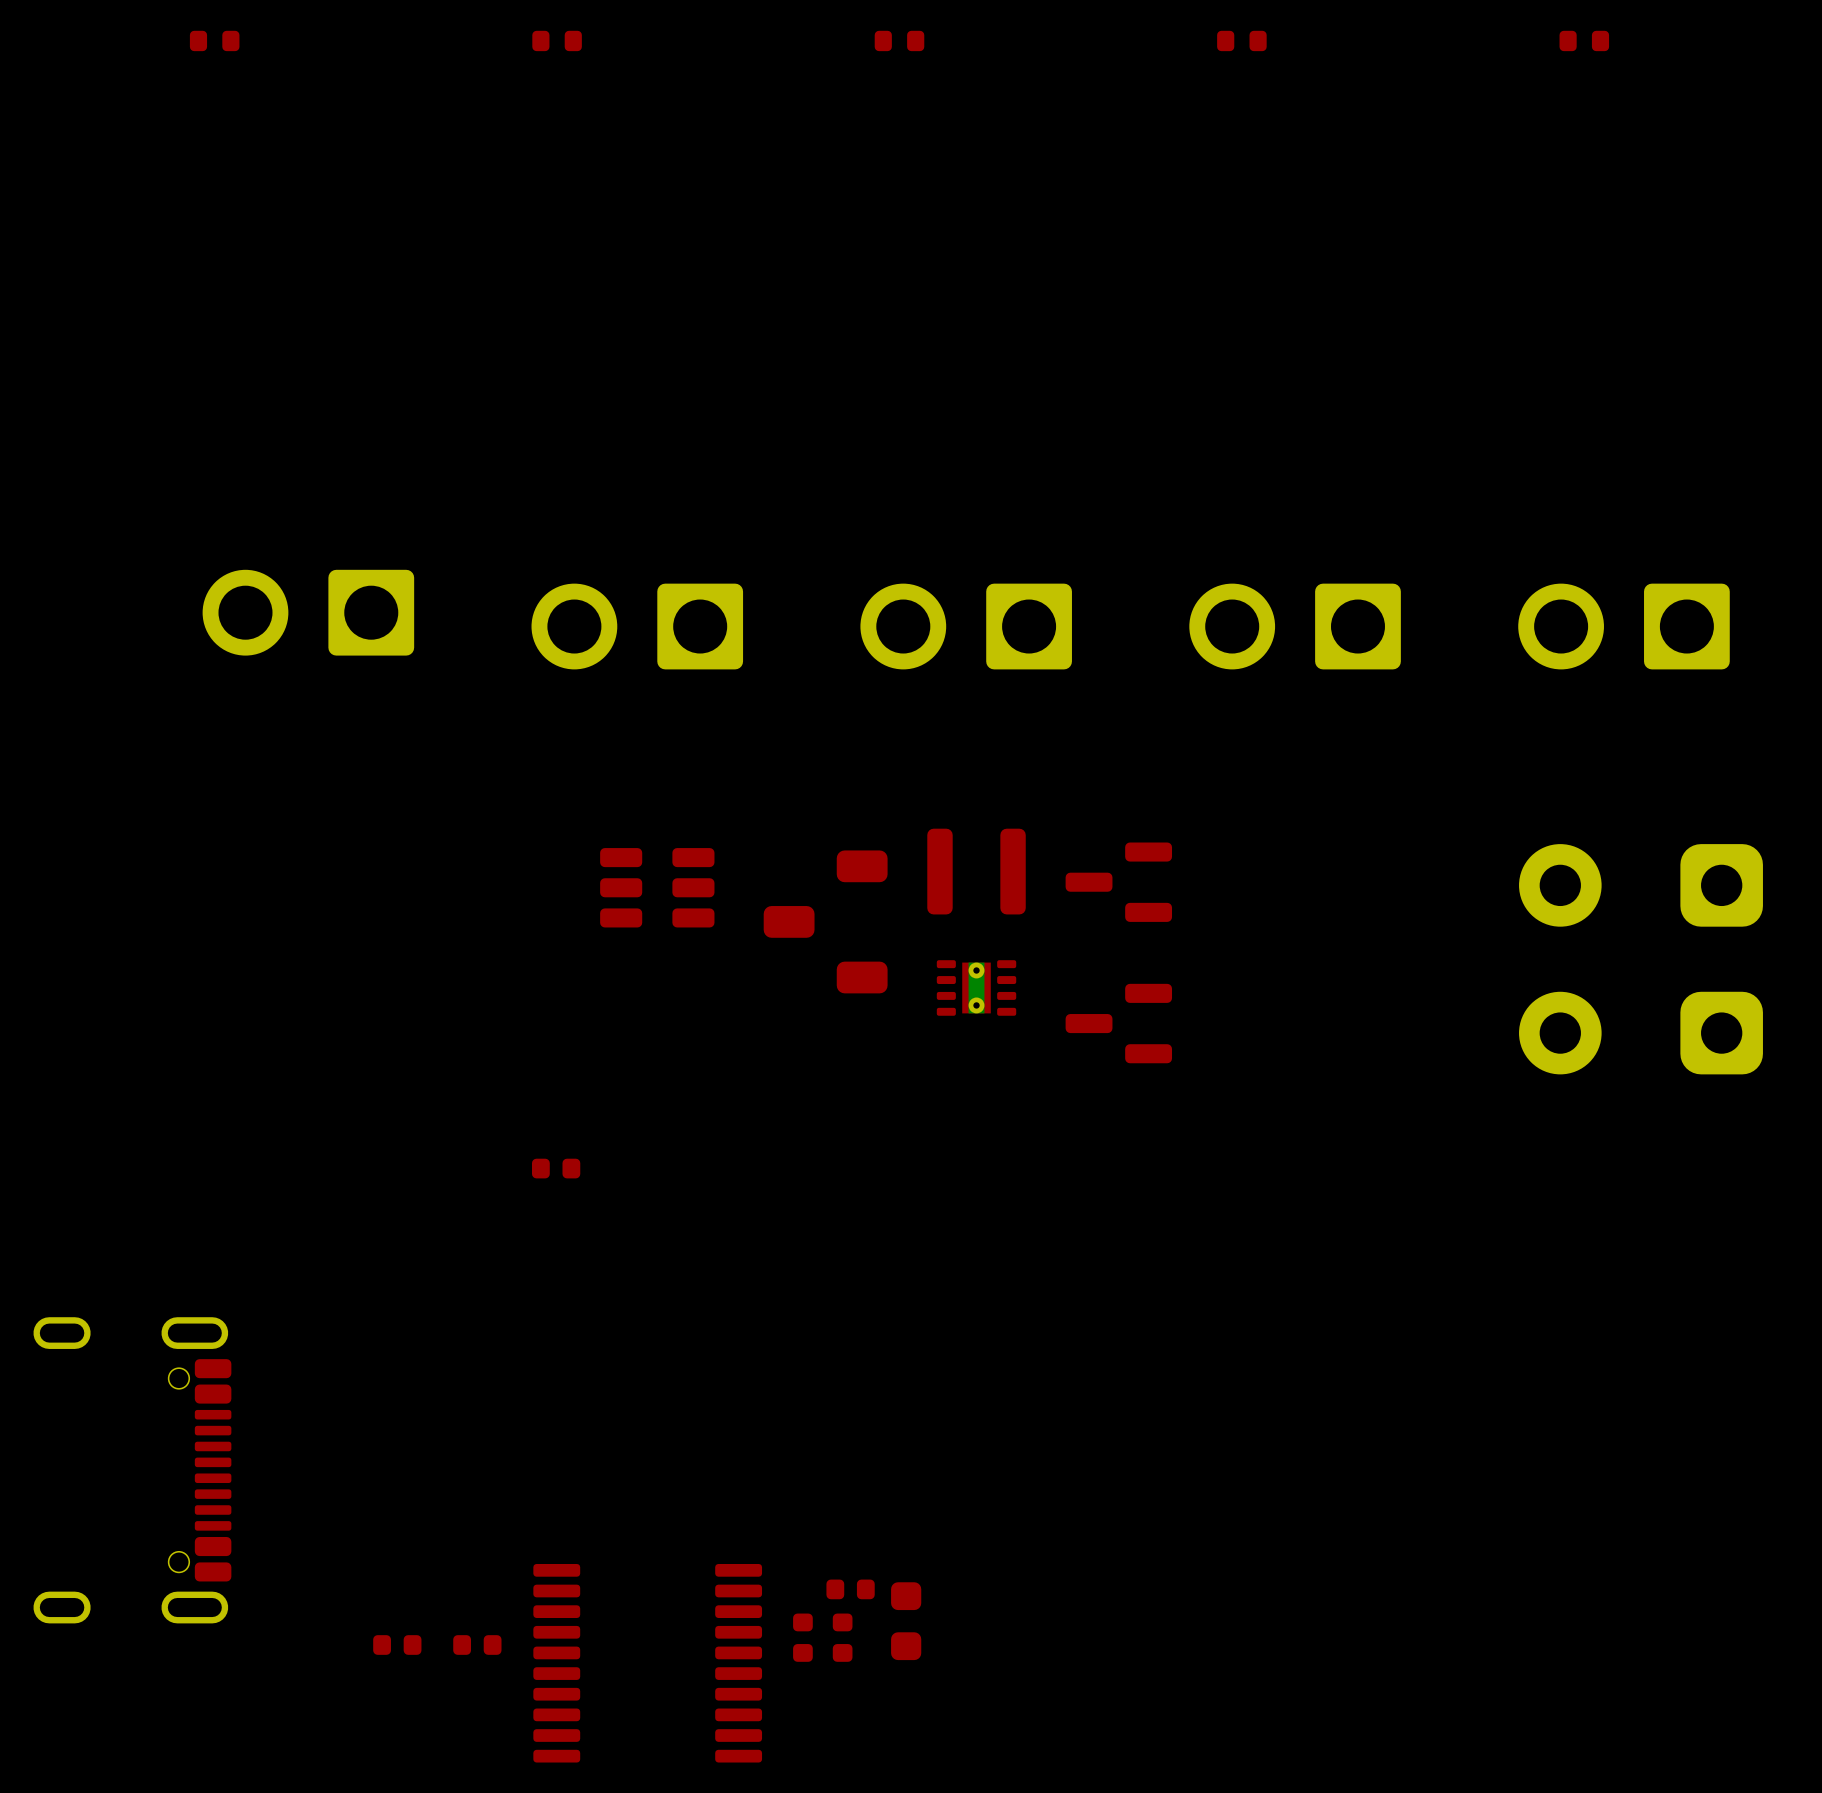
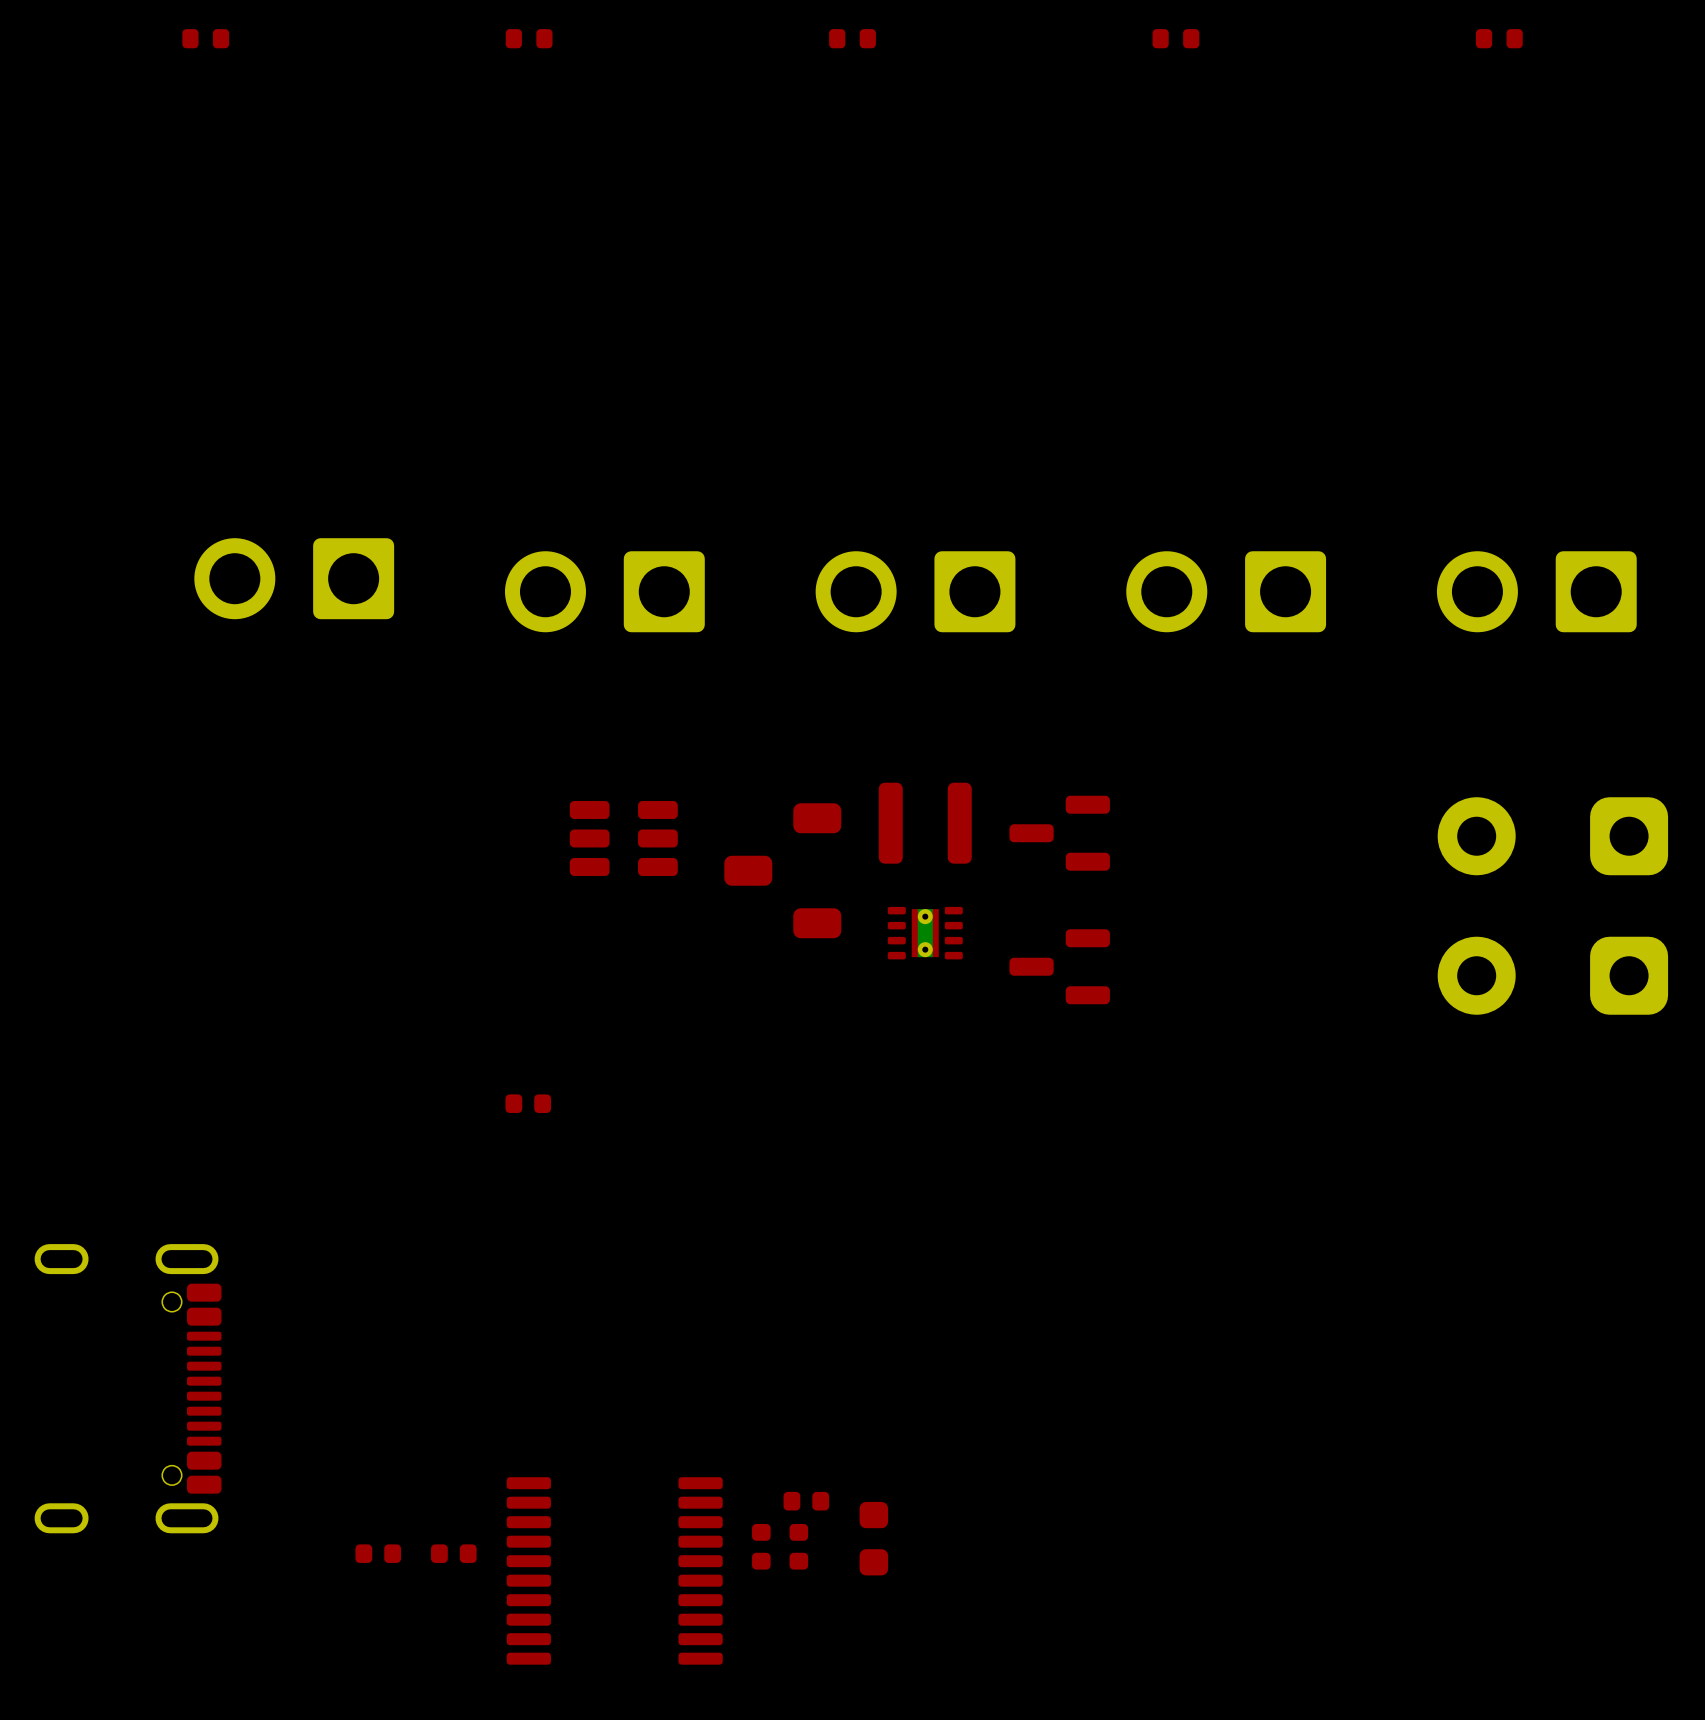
part position: (906, 1621) -> (873, 1538)

